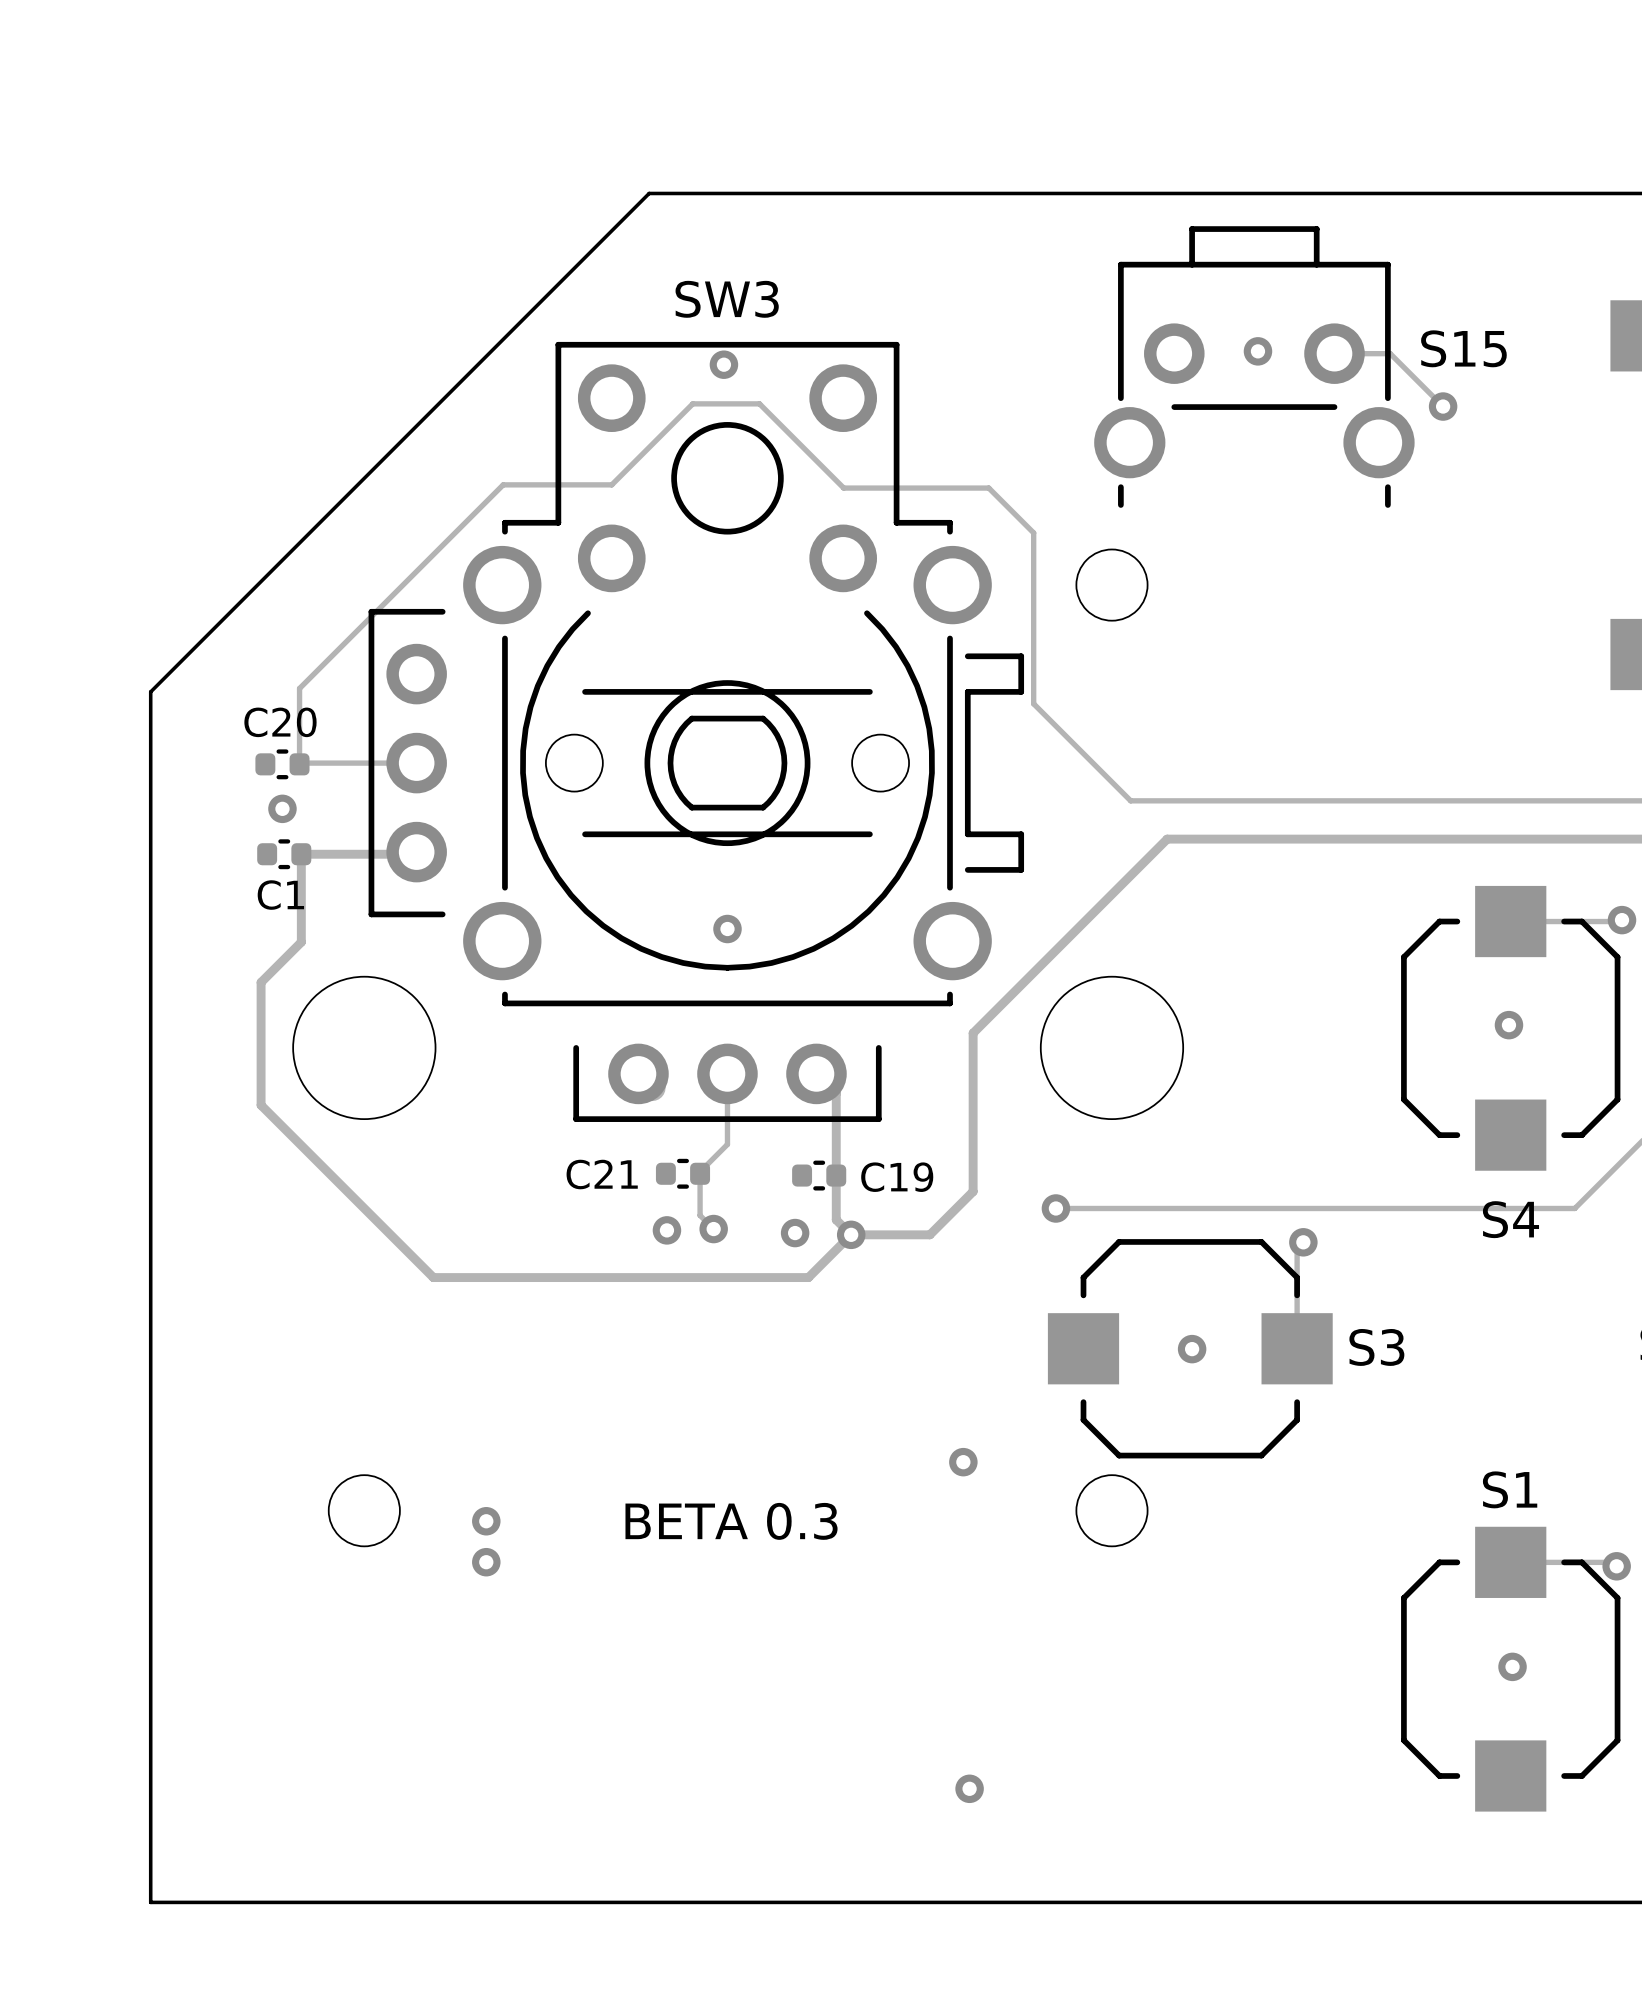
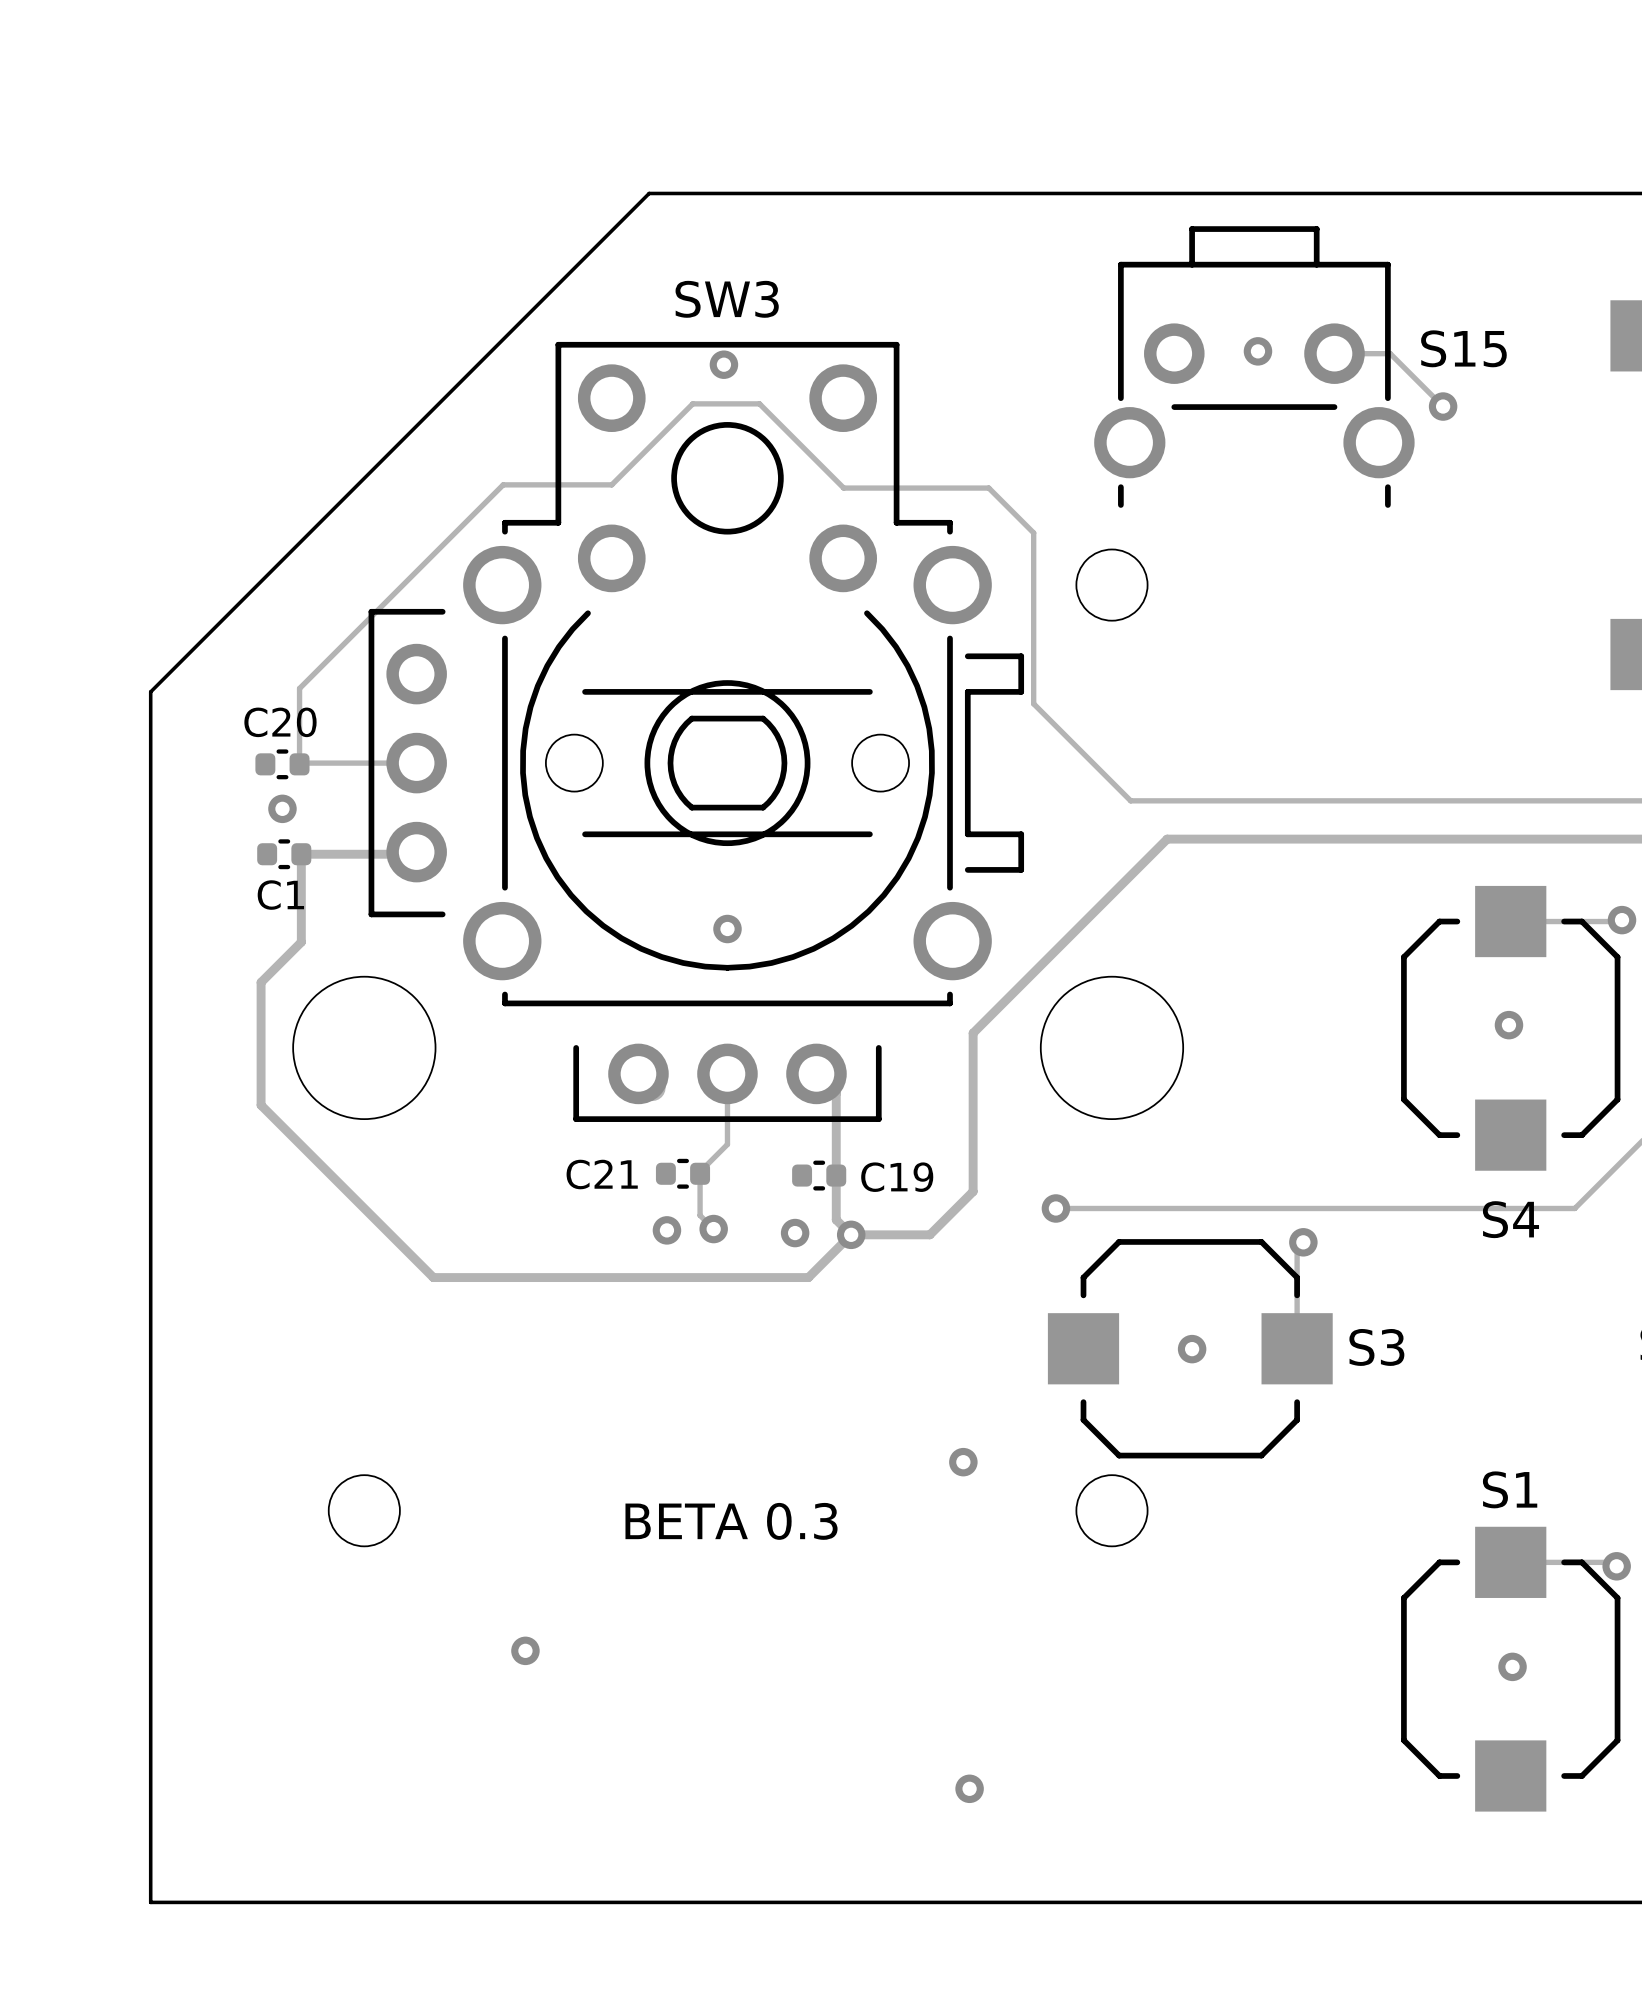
via: (486, 1521) -> none
via: (486, 1562) -> none
via: none -> (525, 1650)

